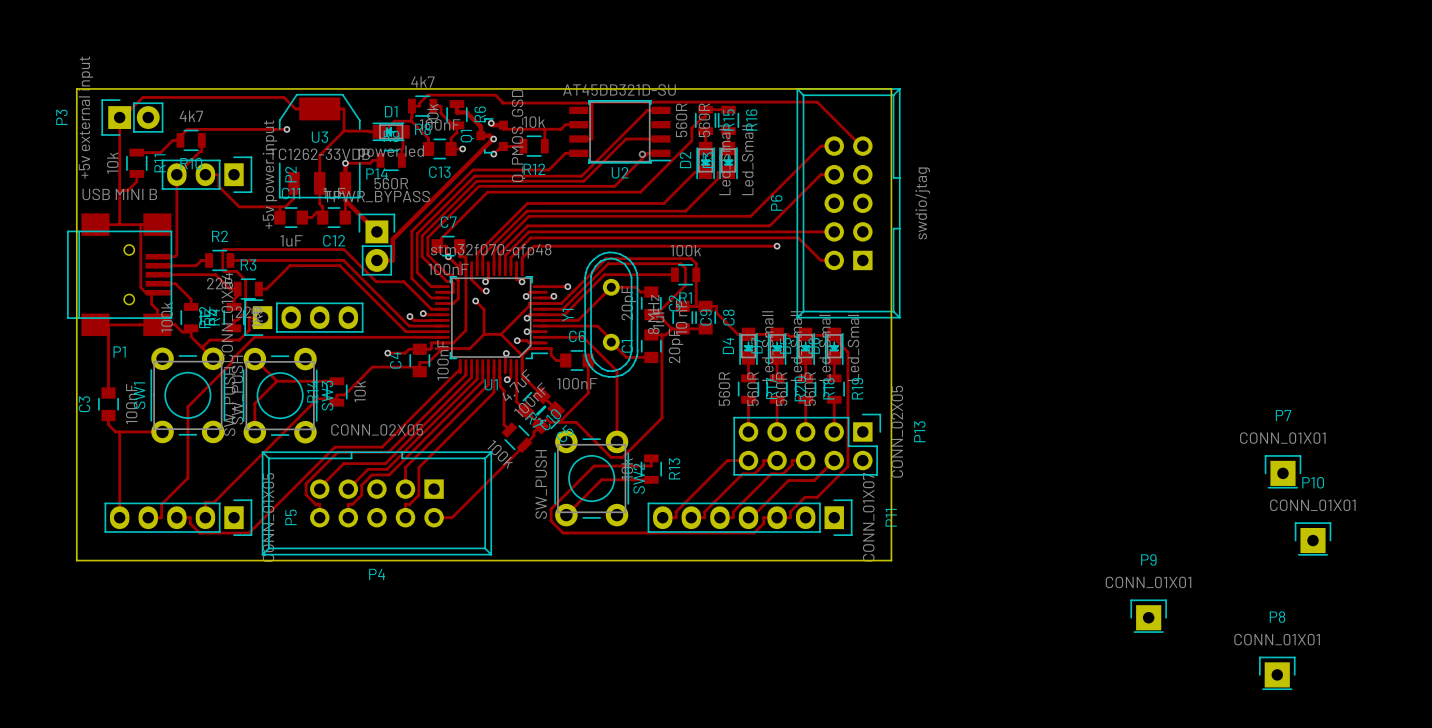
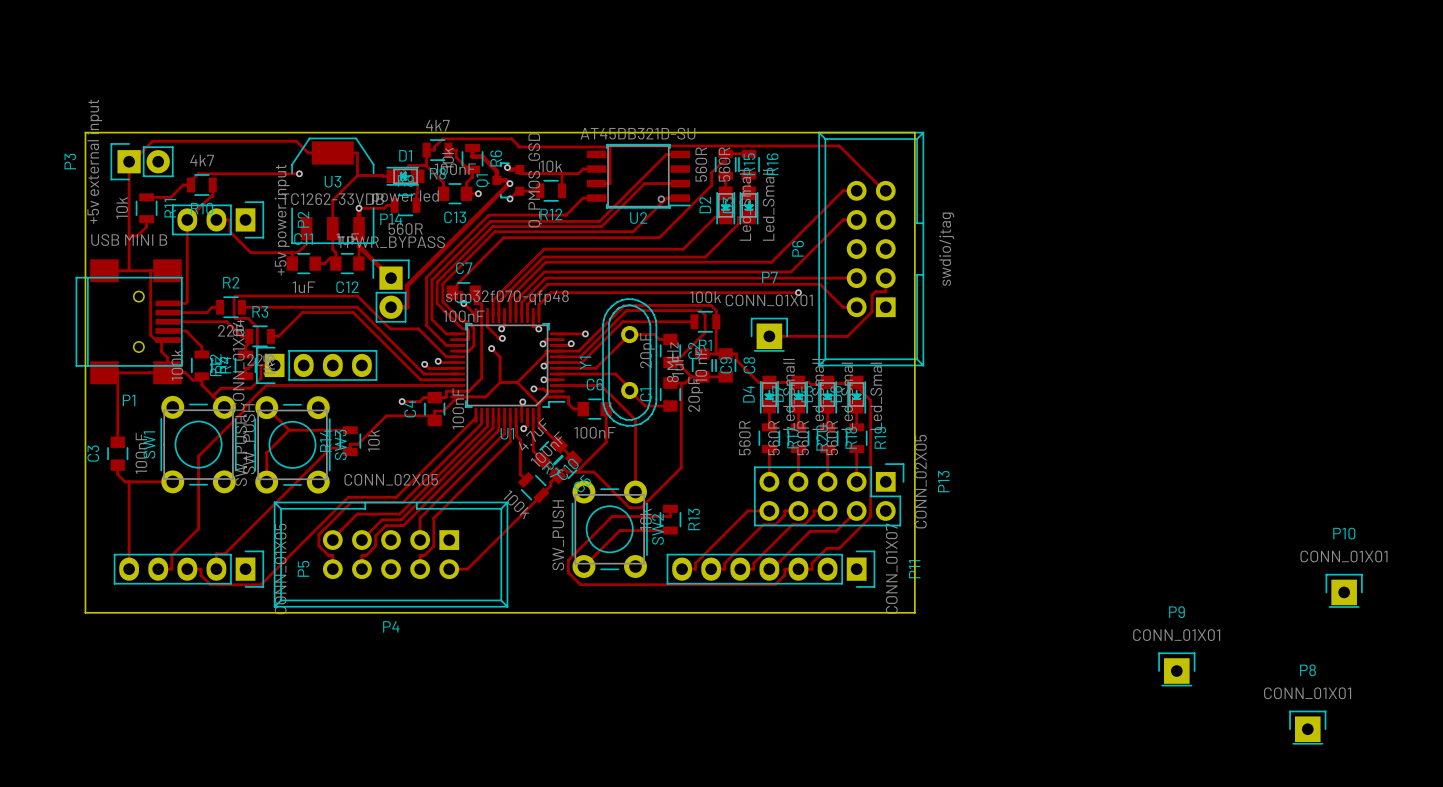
track: none -> (885, 278) (885, 291) (875, 291) (872, 295) (872, 311) (847, 336) (769, 336)
P7 position: (1283, 471) -> (769, 334)

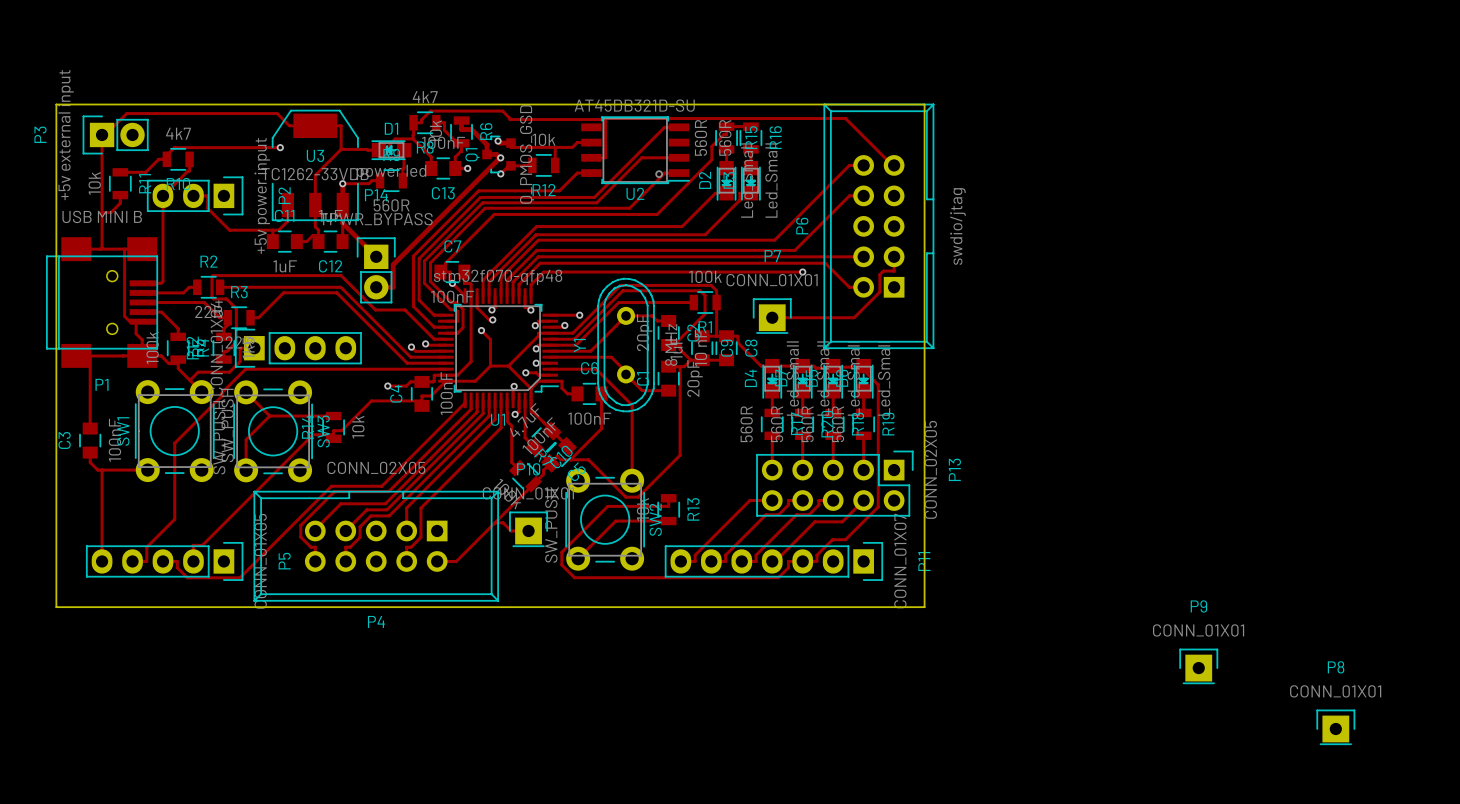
track: none -> (494, 522) (503, 522) (511, 530) (528, 530)
P10 position: (1344, 590) -> (528, 529)

